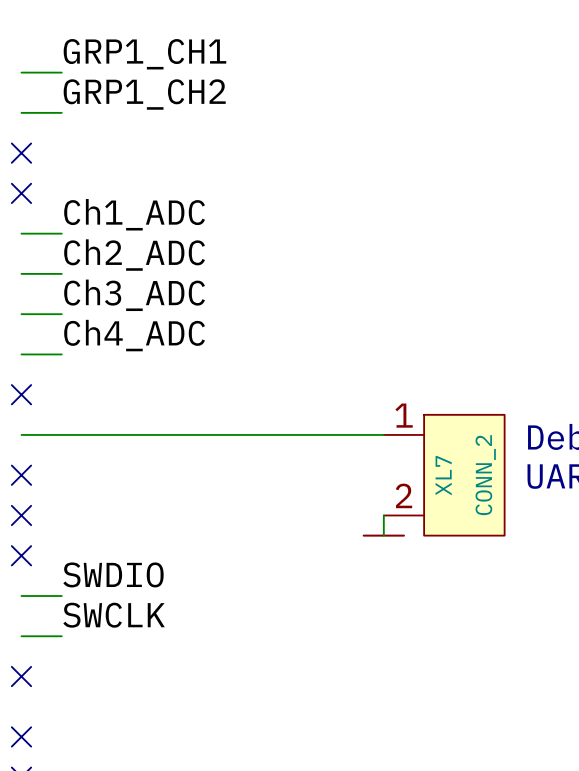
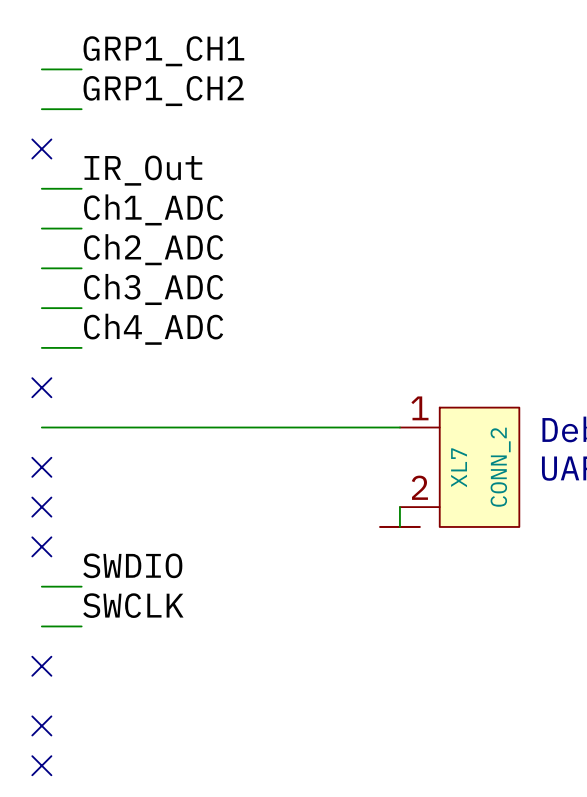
label: none -> IR_Out (143, 170)
wire: none -> (41, 188) (81, 188)
no-connect mark: (21, 193) -> none

